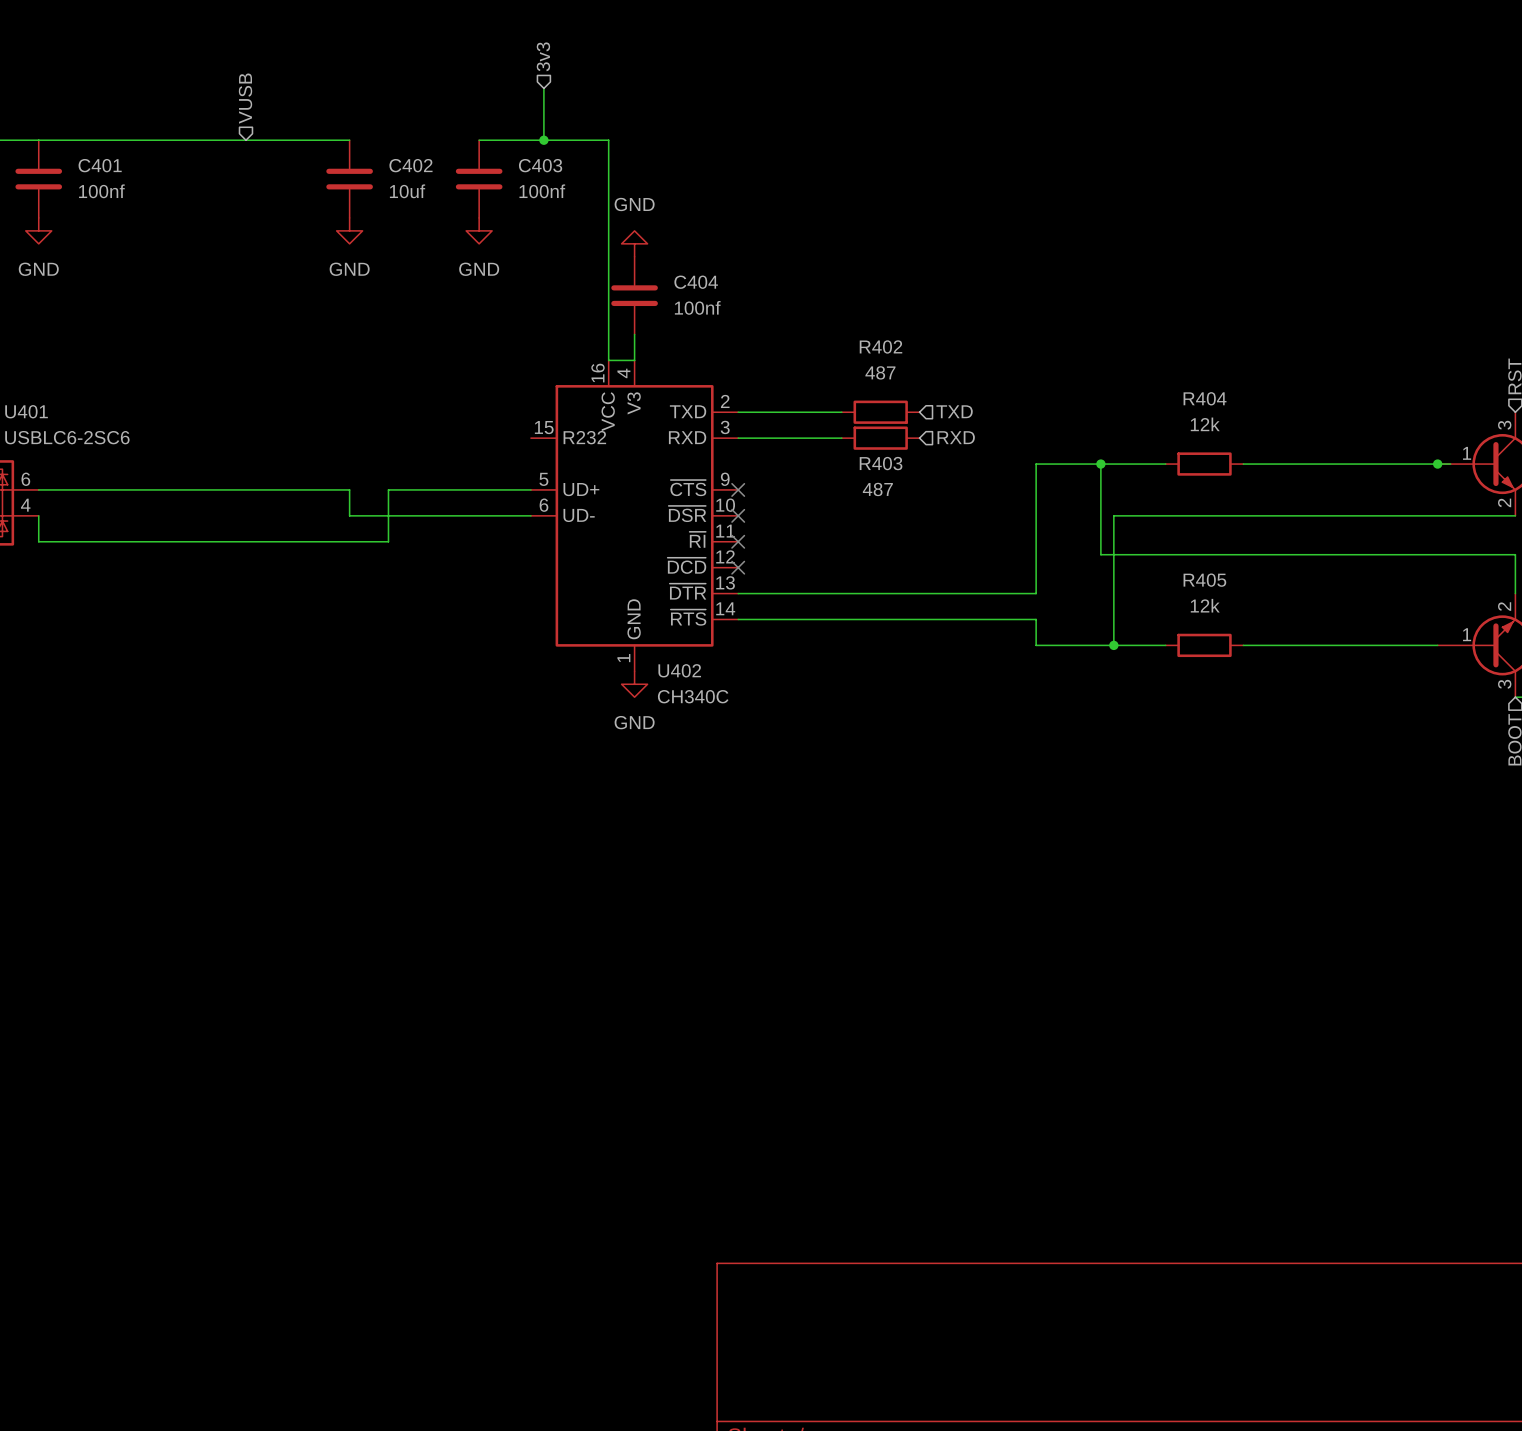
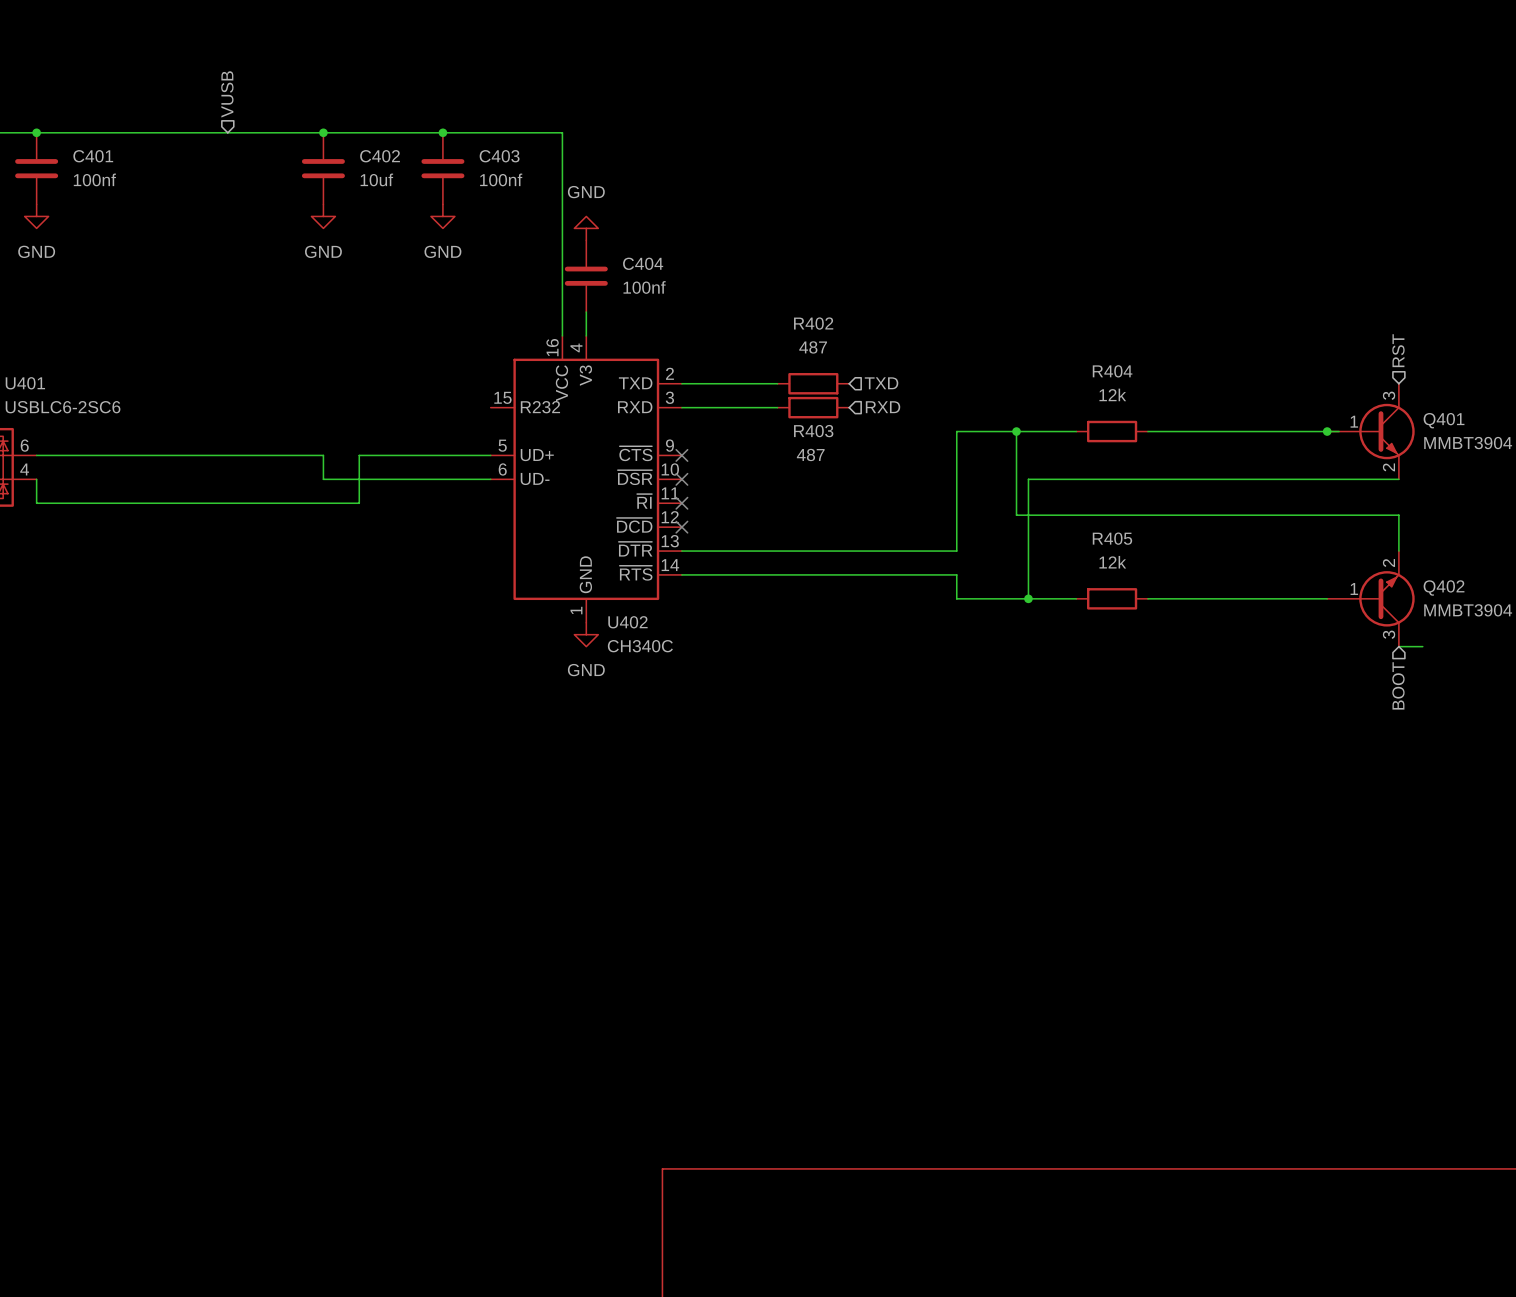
hierarchical label: 3v3 (543, 56) -> none
wire: (543, 88) (543, 140) -> none
junction: none -> (36, 132)
wire: none -> (323, 132) (442, 132)
junction: none -> (323, 132)
junction: none -> (442, 132)
junction: (543, 140) -> none
wire: (608, 360) (634, 360) -> none

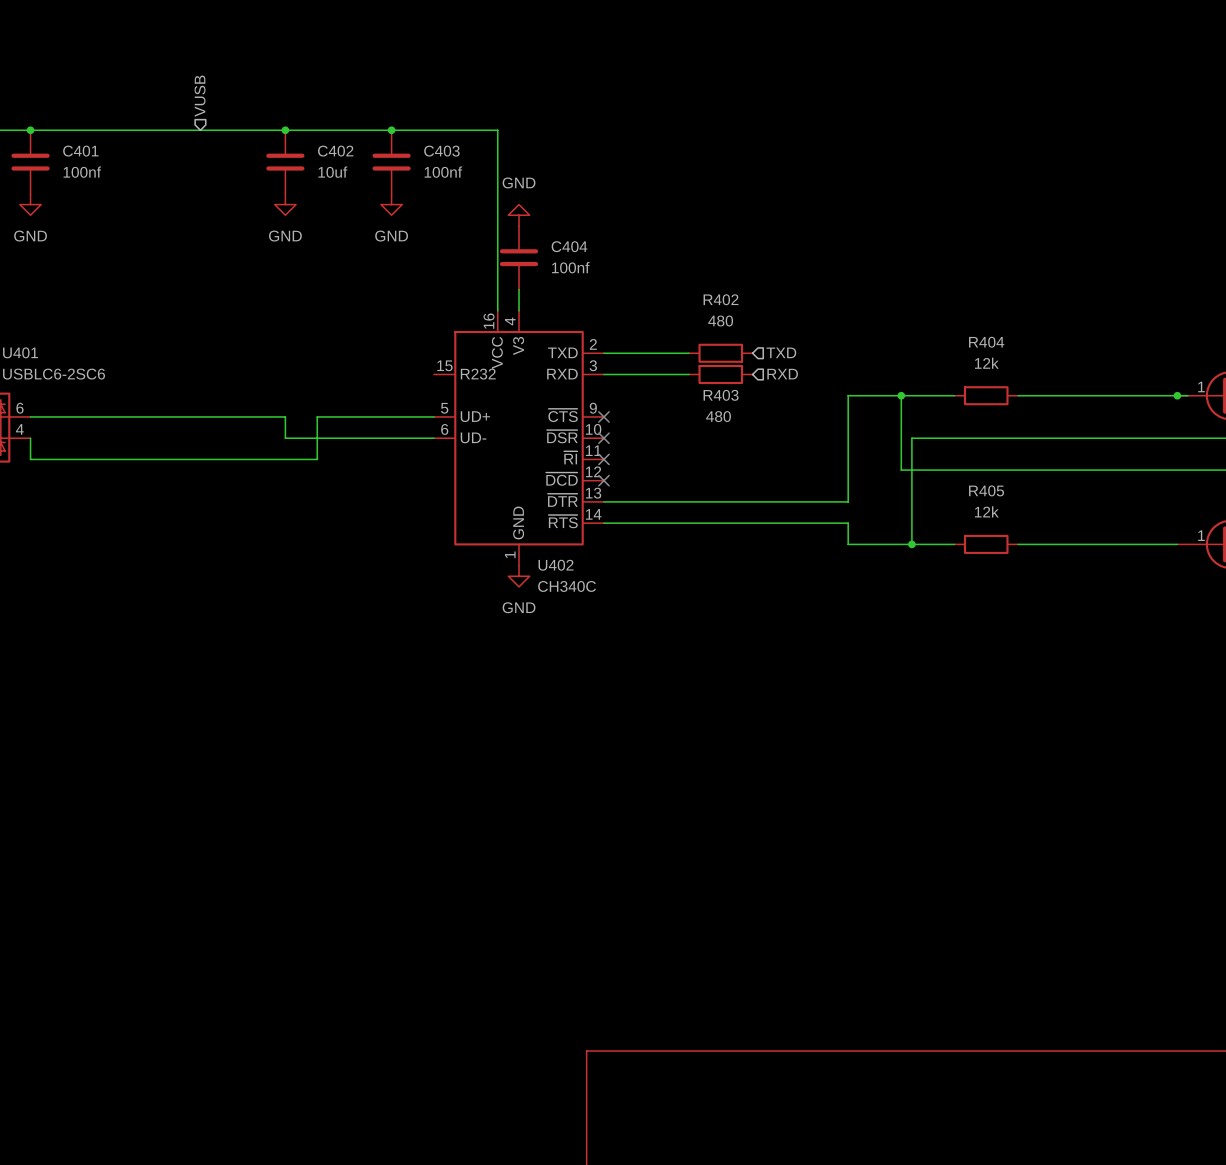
R402 value: 487 (813, 347) -> 480 (720, 321)
R403 value: 487 (810, 454) -> 480 (718, 416)

